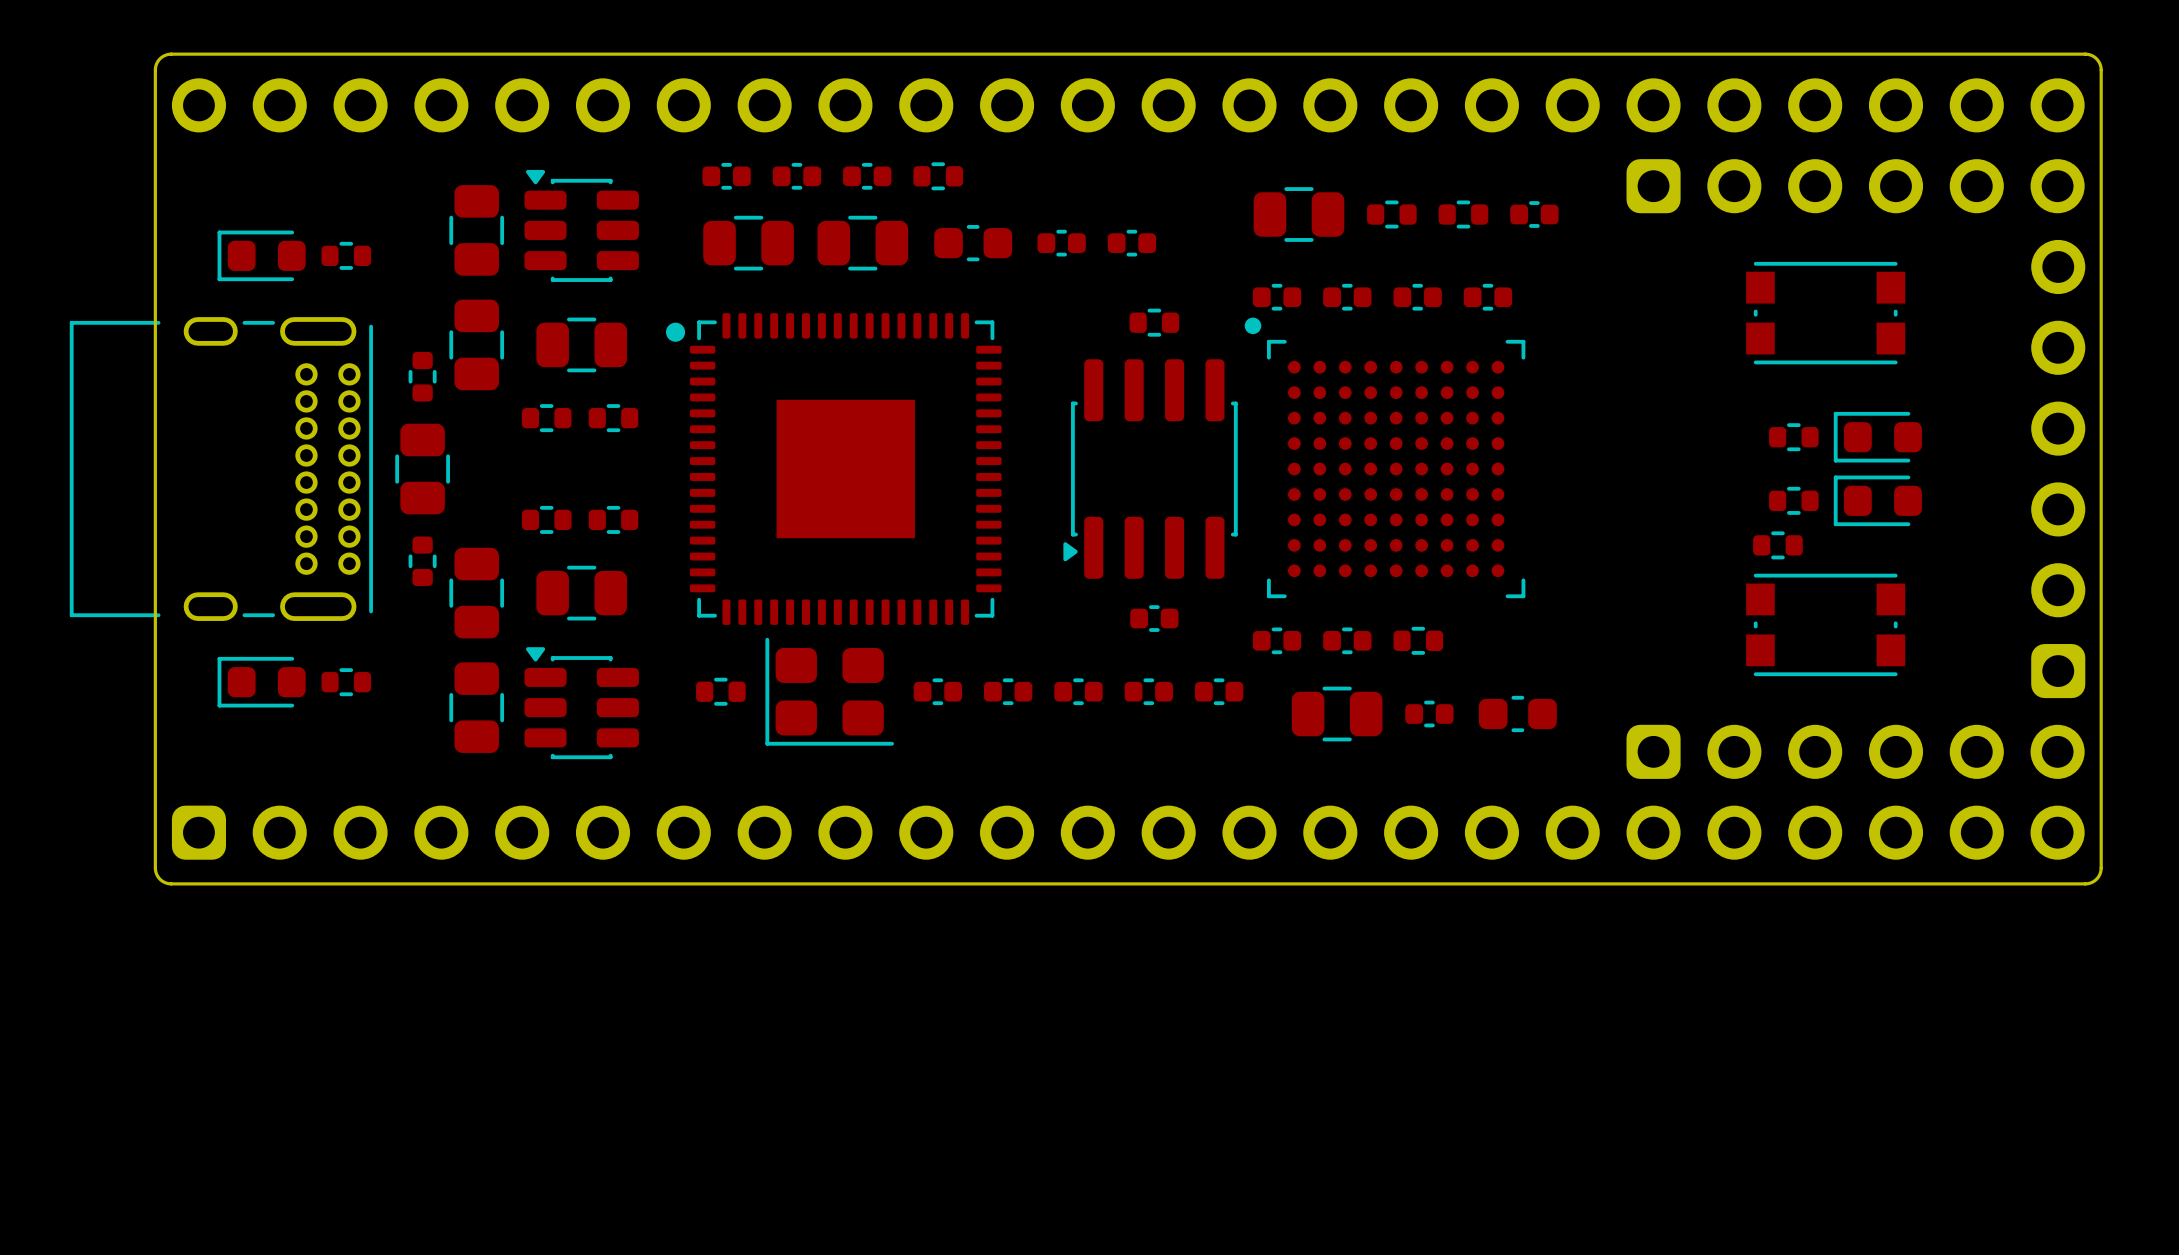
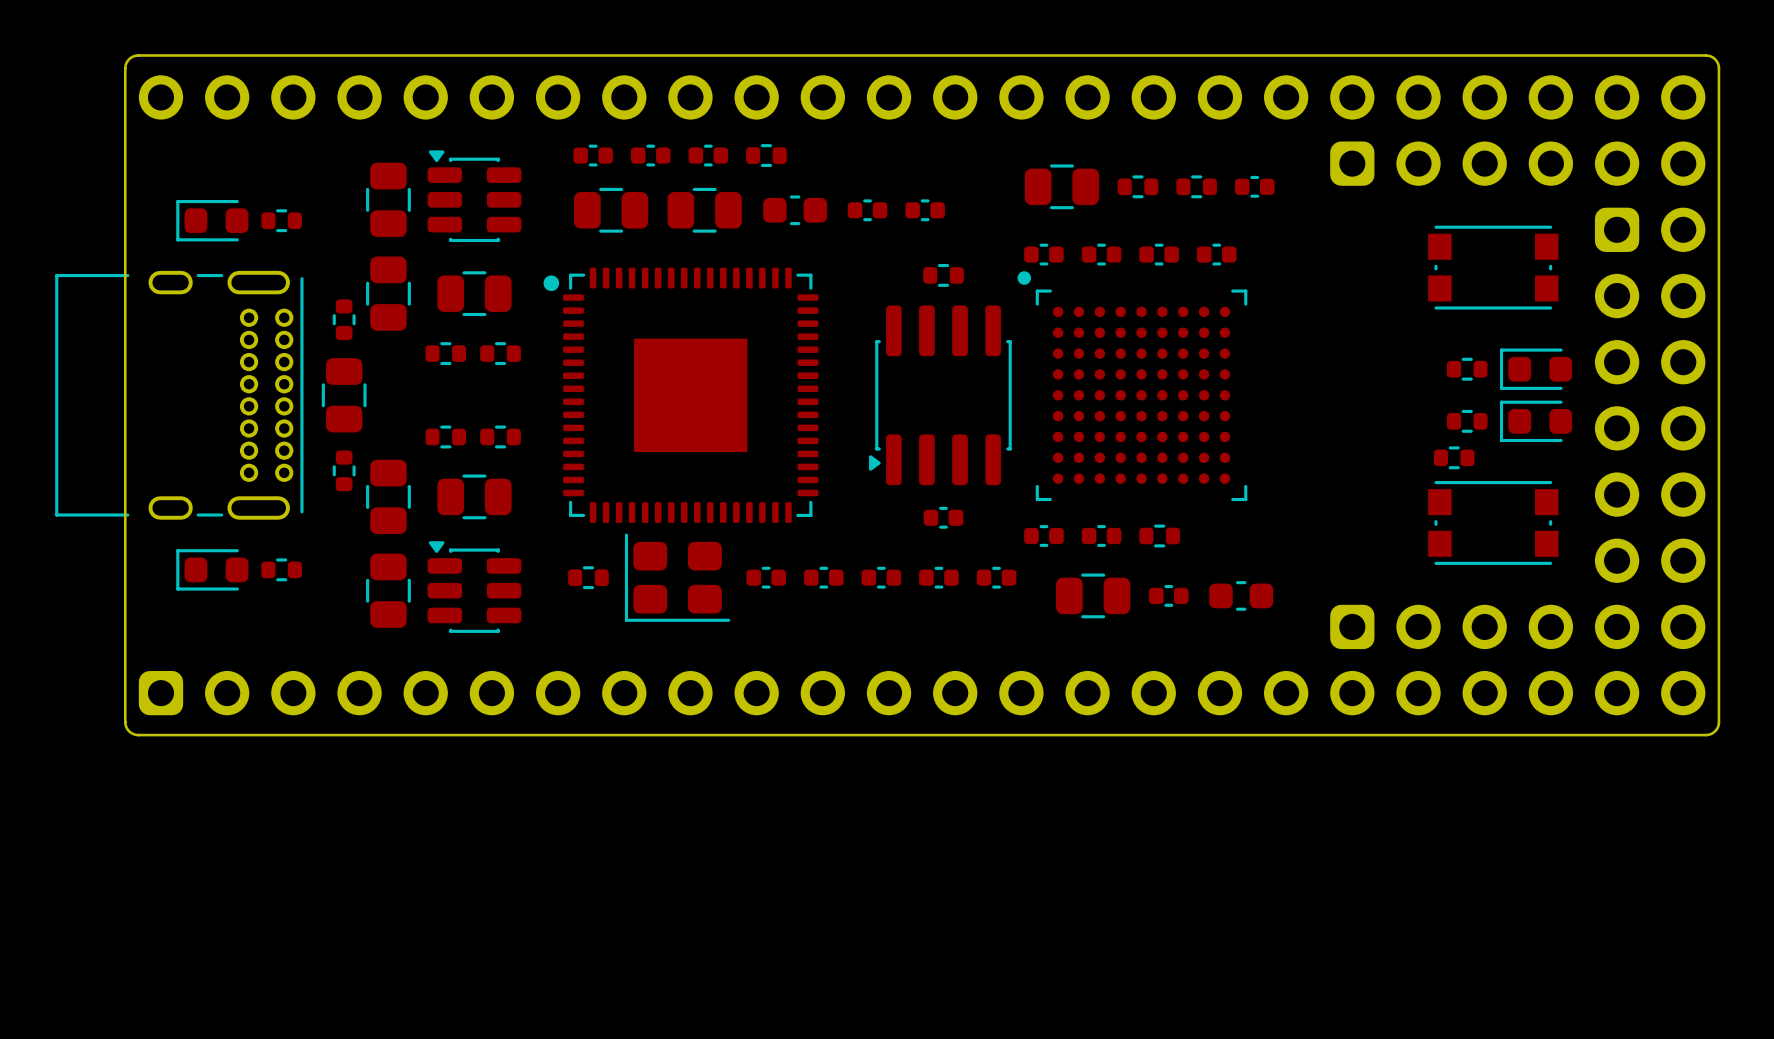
part: none -> (1650, 395)
part: (2058, 469) -> none

